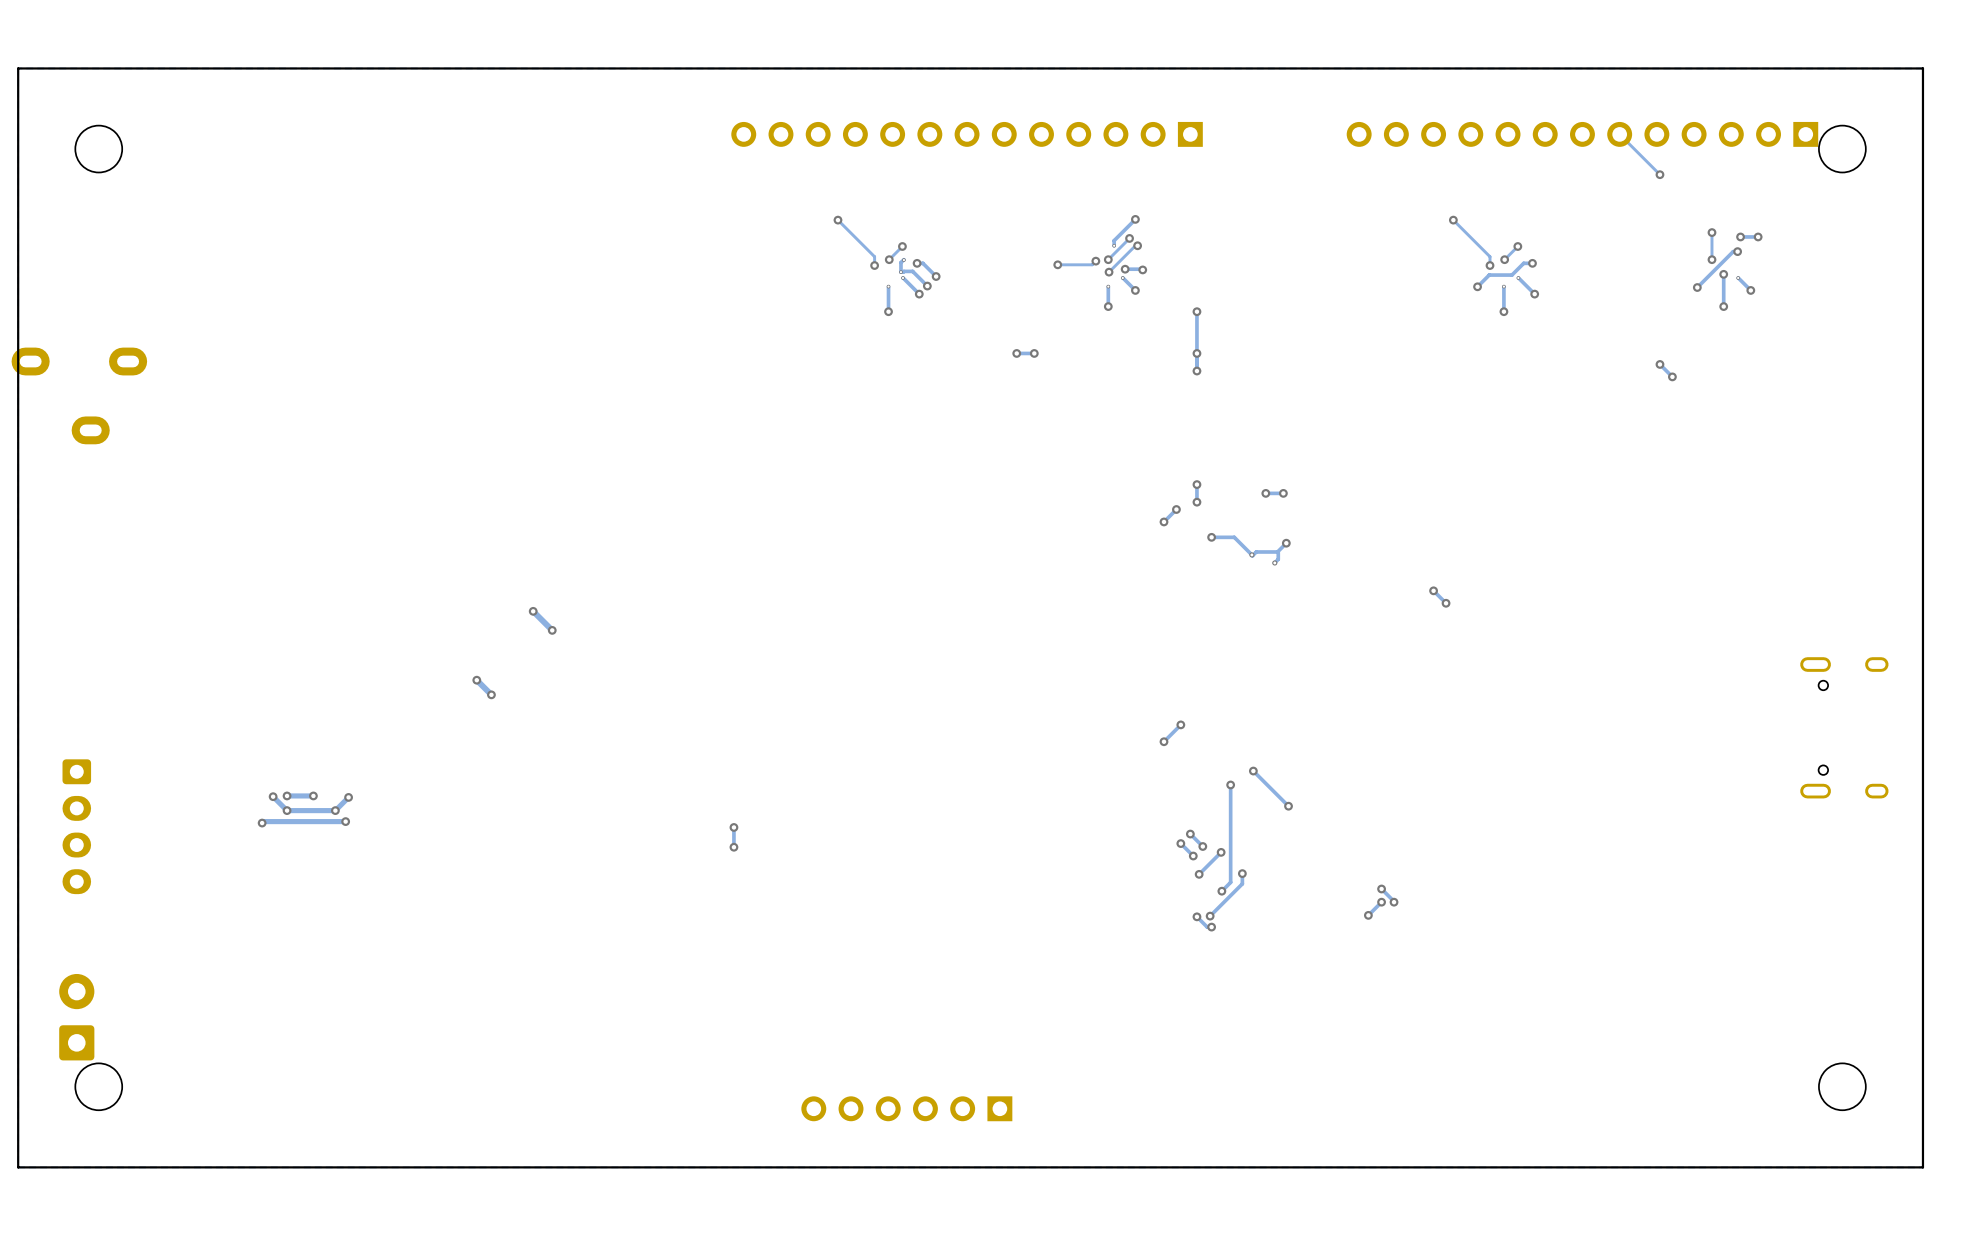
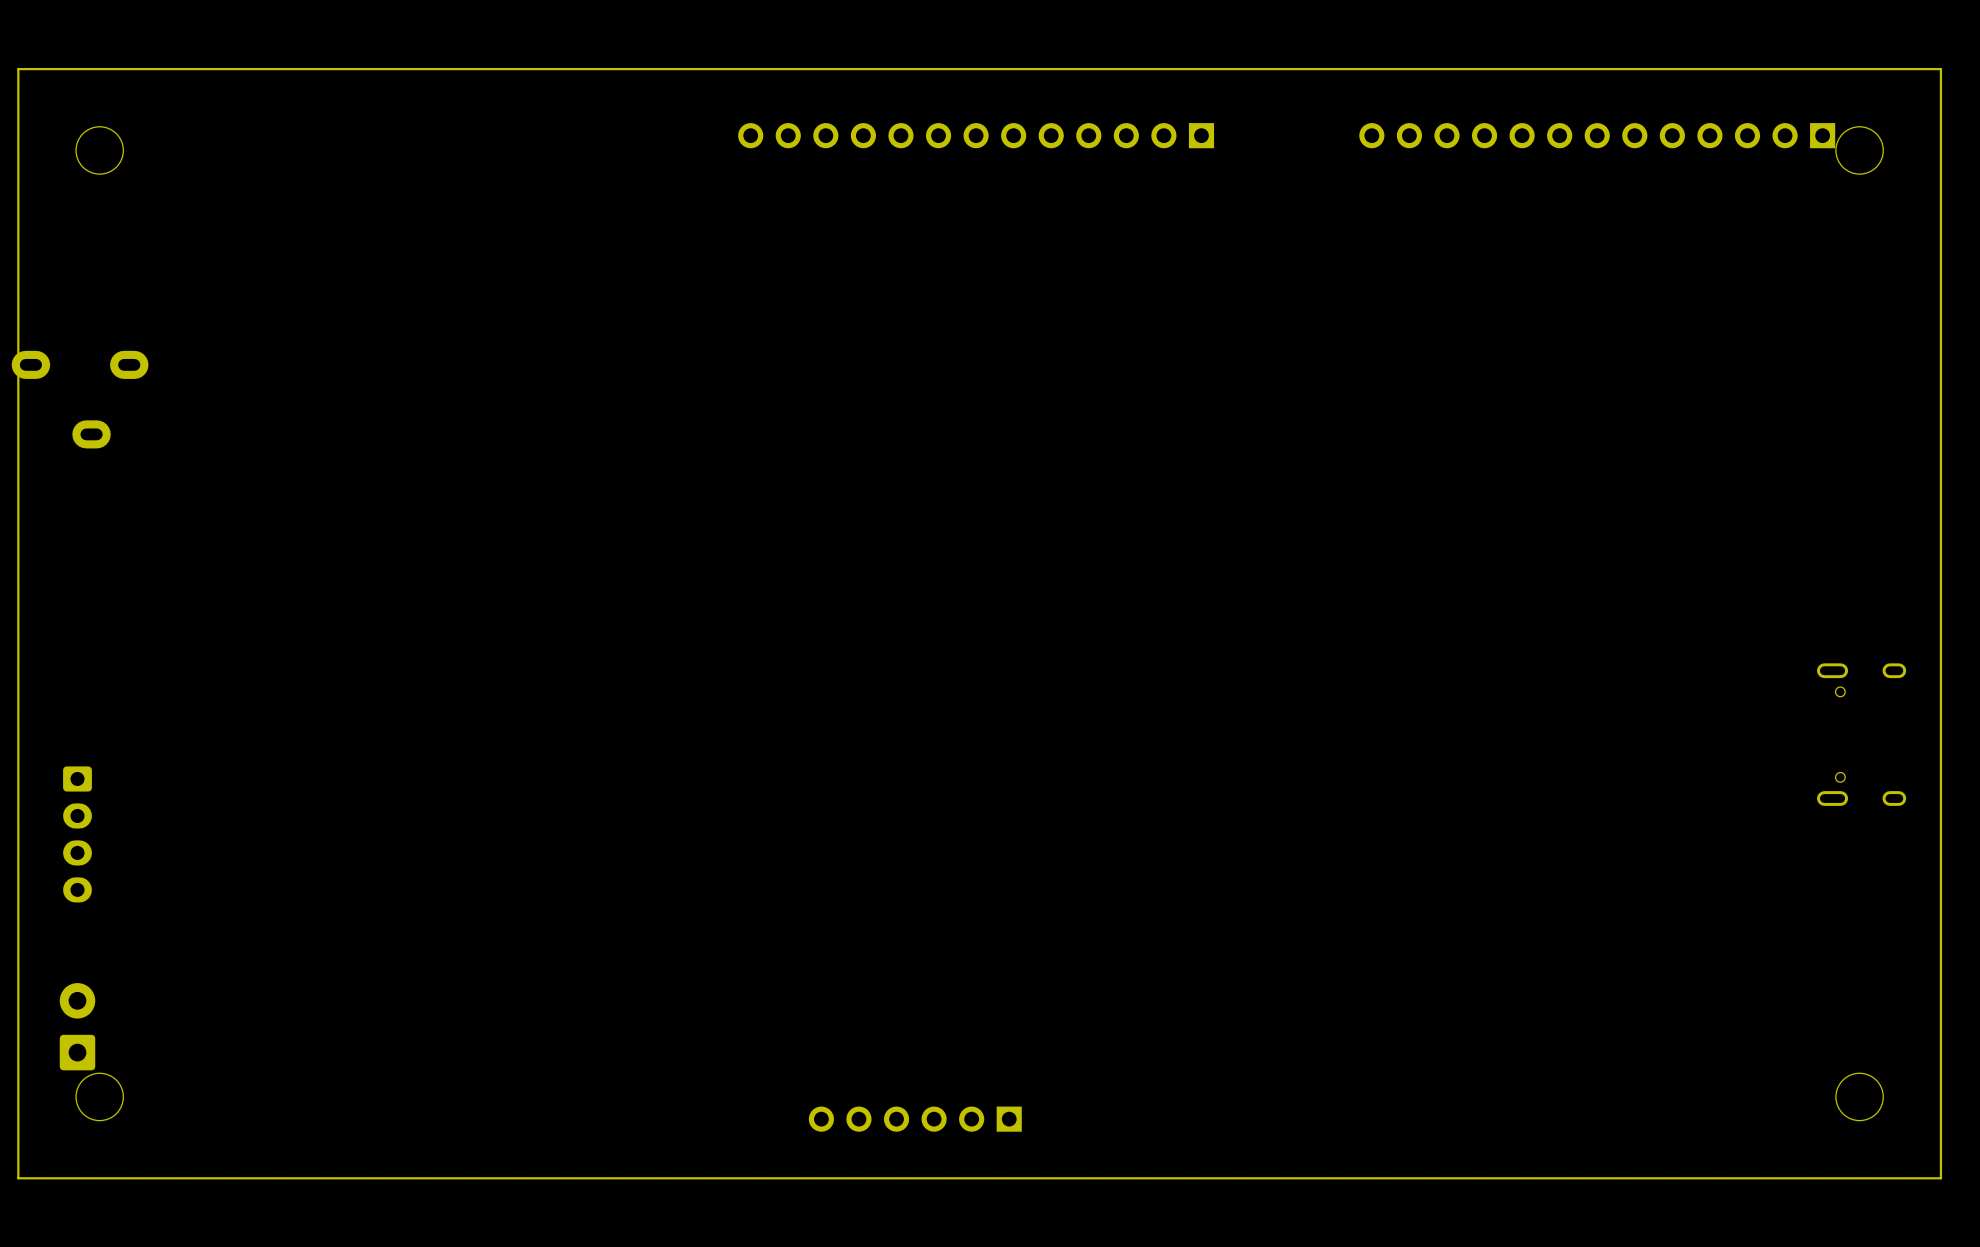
track: (1619, 134) (1659, 174) -> none
via: (1659, 174) -> none
track: (1135, 219) (1114, 240) (1114, 245) -> none
via: (1135, 219) -> none
track: (837, 220) (874, 256) (874, 265) -> none
via: (837, 220) -> none
track: (1453, 220) (1490, 256) (1490, 265) -> none
via: (1453, 220) -> none
track: (1711, 232) (1711, 259) -> none
via: (1711, 232) -> none
via: (1740, 236) -> none
track: (1758, 236) (1740, 236) -> none
via: (1758, 236) -> none
track: (1129, 238) (1108, 259) -> none
via: (1129, 238) -> none
via: (1114, 245) -> none
track: (1135, 245) (1109, 272) -> none
via: (1137, 245) -> none
track: (902, 246) (889, 259) -> none
via: (902, 246) -> none
track: (1517, 246) (1504, 259) -> none
via: (1517, 246) -> none
track: (1737, 251) (1733, 251) (1697, 287) -> none
via: (1737, 251) -> none
via: (889, 259) -> none
track: (903, 259) (900, 262) (900, 272) (912, 271) (927, 286) -> none
via: (1108, 259) -> none
via: (1504, 259) -> none
via: (1711, 259) -> none
via: (903, 260) -> none
track: (1095, 261) (1092, 264) (1057, 264) -> none
via: (1095, 261) -> none
track: (917, 263) (922, 263) (936, 276) -> none
via: (917, 263) -> none
track: (1532, 263) (1523, 263) (1511, 275) (1489, 275) (1477, 286) -> none
via: (1532, 263) -> none
via: (1057, 264) -> none
via: (874, 265) -> none
via: (1490, 265) -> none
track: (1125, 269) (1142, 269) -> none
via: (1125, 269) -> none
via: (1142, 269) -> none
via: (900, 272) -> none
via: (1109, 272) -> none
track: (1723, 274) (1723, 306) -> none
via: (1723, 274) -> none
via: (936, 276) -> none
via: (902, 277) -> none
track: (903, 277) (919, 294) -> none
track: (1122, 277) (1135, 290) -> none
via: (1122, 277) -> none
track: (1518, 277) (1534, 294) -> none
via: (1518, 277) -> none
track: (1738, 277) (1750, 290) -> none
via: (1738, 277) -> none
track: (888, 286) (888, 311) -> none
via: (888, 286) -> none
via: (927, 286) -> none
track: (1108, 286) (1108, 306) -> none
via: (1108, 286) -> none
via: (1477, 286) -> none
track: (1503, 286) (1503, 311) -> none
via: (1503, 286) -> none
via: (1697, 287) -> none
via: (1135, 290) -> none
via: (1750, 290) -> none
via: (919, 294) -> none
via: (1534, 294) -> none
via: (1108, 306) -> none
via: (1723, 306) -> none
via: (888, 311) -> none
track: (1196, 311) (1196, 371) -> none
via: (1196, 311) -> none
via: (1503, 311) -> none
via: (1016, 353) -> none
track: (1034, 353) (1016, 353) -> none
via: (1034, 353) -> none
via: (1196, 353) -> none
track: (1659, 364) (1672, 376) -> none
via: (1659, 364) -> none
via: (1196, 371) -> none
via: (1672, 376) -> none
track: (1196, 484) (1196, 502) -> none
via: (1196, 484) -> none
via: (1265, 493) -> none
track: (1283, 493) (1265, 493) -> none
via: (1283, 493) -> none
via: (1196, 502) -> none
track: (1176, 509) (1163, 521) -> none
via: (1176, 509) -> none
via: (1163, 521) -> none
track: (1211, 537) (1234, 537) (1252, 555) -> none
via: (1211, 537) -> none
track: (1286, 543) (1277, 551) -> none
via: (1286, 543) -> none
track: (1277, 551) (1256, 551) (1252, 555) -> none
track: (1277, 551) (1278, 559) (1274, 562) -> none
via: (1251, 554) -> none
via: (1274, 562) -> none
track: (1433, 590) (1446, 603) -> none
via: (1433, 590) -> none
via: (1446, 603) -> none
track: (533, 611) (552, 630) -> none
via: (533, 611) -> none
via: (552, 630) -> none
track: (476, 680) (491, 694) -> none
via: (476, 680) -> none
via: (491, 694) -> none
track: (1180, 724) (1163, 741) -> none
via: (1180, 724) -> none
via: (1163, 741) -> none
track: (1253, 771) (1288, 806) -> none
via: (1253, 771) -> none
track: (1230, 784) (1230, 882) (1221, 891) -> none
via: (1230, 784) -> none
via: (287, 795) -> none
track: (313, 795) (287, 795) -> none
via: (313, 795) -> none
track: (273, 796) (287, 810) (335, 810) (348, 797) -> none
via: (273, 796) -> none
via: (348, 797) -> none
via: (1288, 806) -> none
via: (287, 810) -> none
via: (335, 810) -> none
track: (345, 821) (263, 821) -> none
via: (345, 821) -> none
via: (262, 823) -> none
track: (733, 827) (733, 847) -> none
via: (733, 827) -> none
track: (1190, 834) (1202, 846) -> none
via: (1190, 834) -> none
track: (1180, 843) (1193, 856) -> none
via: (1180, 843) -> none
via: (1202, 846) -> none
via: (733, 847) -> none
track: (1221, 852) (1199, 874) -> none
via: (1221, 852) -> none
via: (1193, 856) -> none
track: (1242, 873) (1242, 883) (1210, 916) -> none
via: (1242, 873) -> none
via: (1199, 874) -> none
track: (1381, 888) (1394, 902) -> none
via: (1381, 888) -> none
via: (1221, 891) -> none
track: (1381, 902) (1368, 915) -> none
via: (1381, 902) -> none
via: (1394, 902) -> none
via: (1368, 915) -> none
track: (1196, 916) (1207, 927) (1211, 927) -> none
via: (1196, 916) -> none
via: (1210, 916) -> none
via: (1211, 927) -> none

